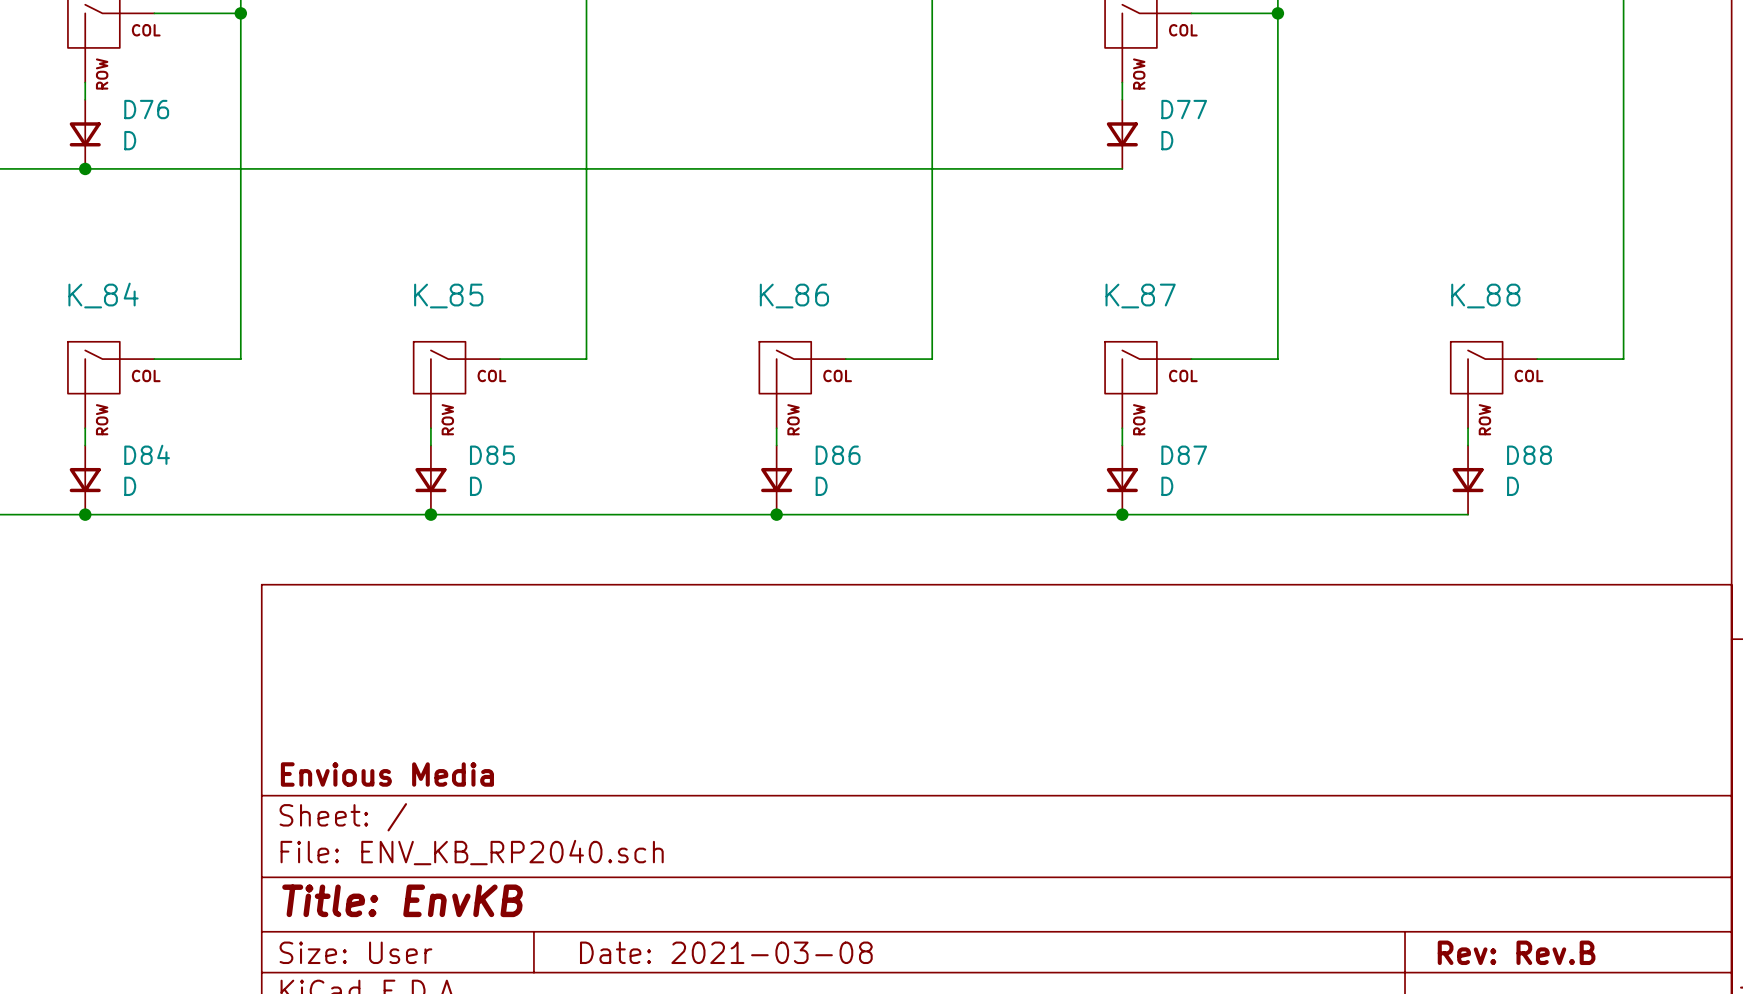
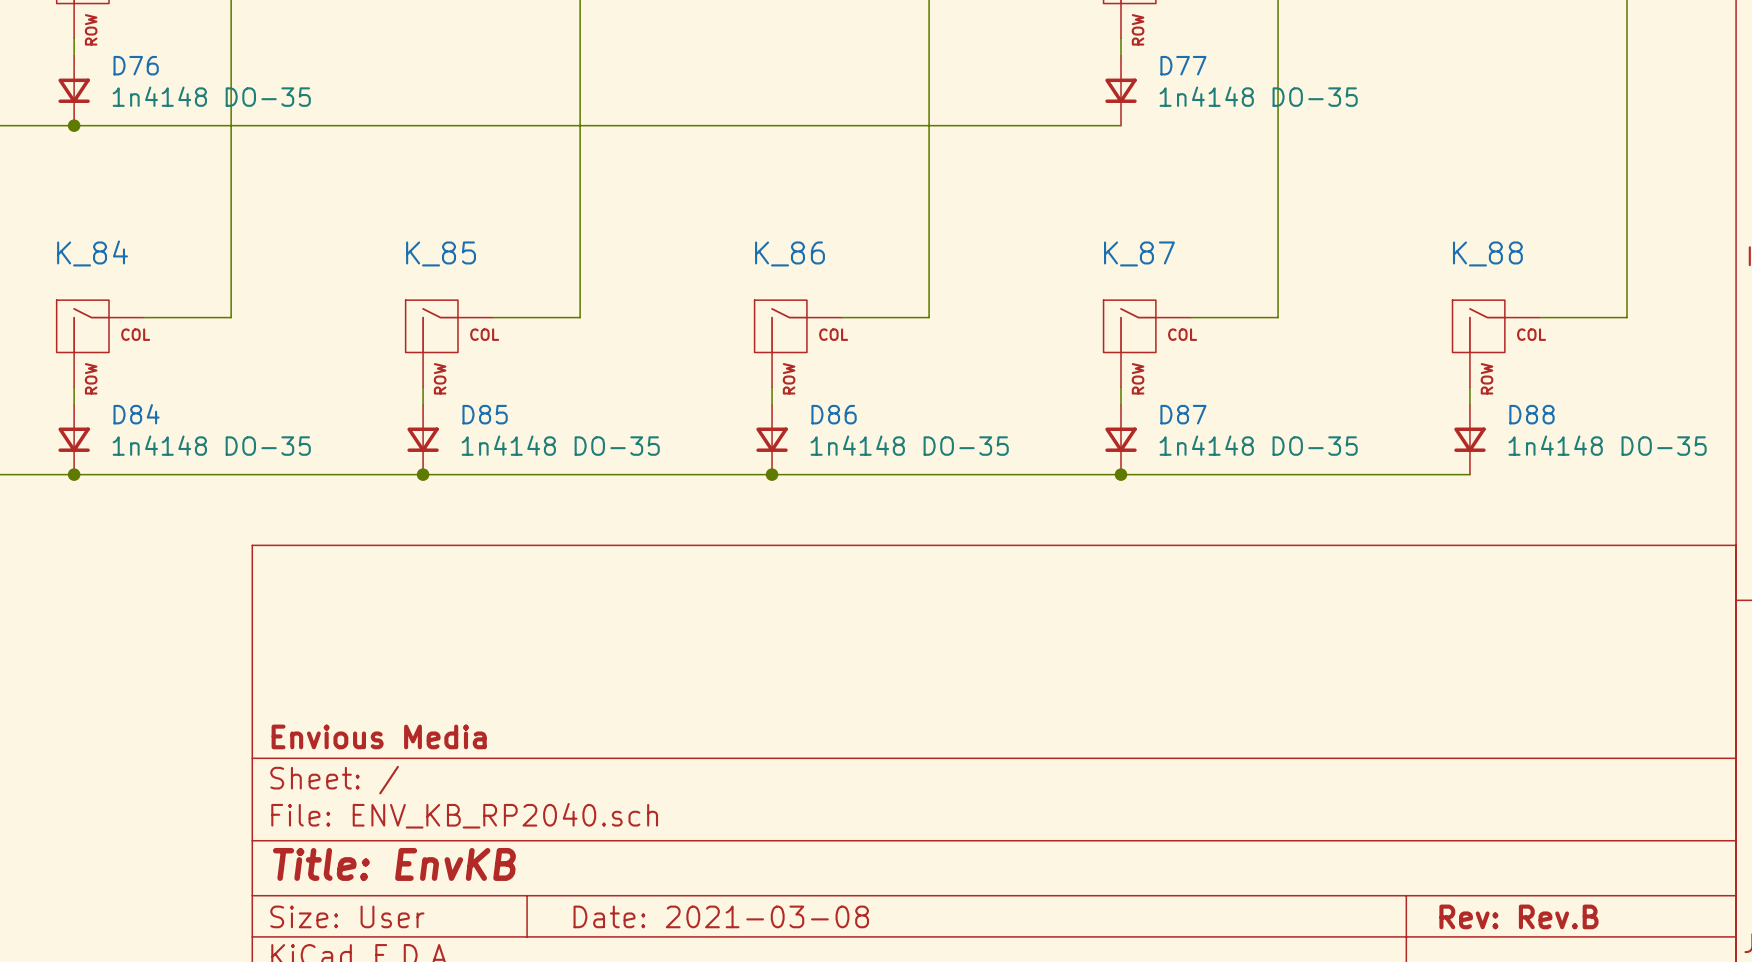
D76 value: D (130, 140) -> 1n4148 DO-35 (211, 96)
D77 value: D (1167, 140) -> 1n4148 DO-35 (1258, 96)
D84 value: D (130, 486) -> 1n4148 DO-35 (211, 445)
D85 value: D (475, 486) -> 1n4148 DO-35 (560, 445)
D86 value: D (821, 486) -> 1n4148 DO-35 (909, 445)
D87 value: D (1167, 486) -> 1n4148 DO-35 (1258, 445)
D88 value: D (1513, 486) -> 1n4148 DO-35 (1607, 445)

